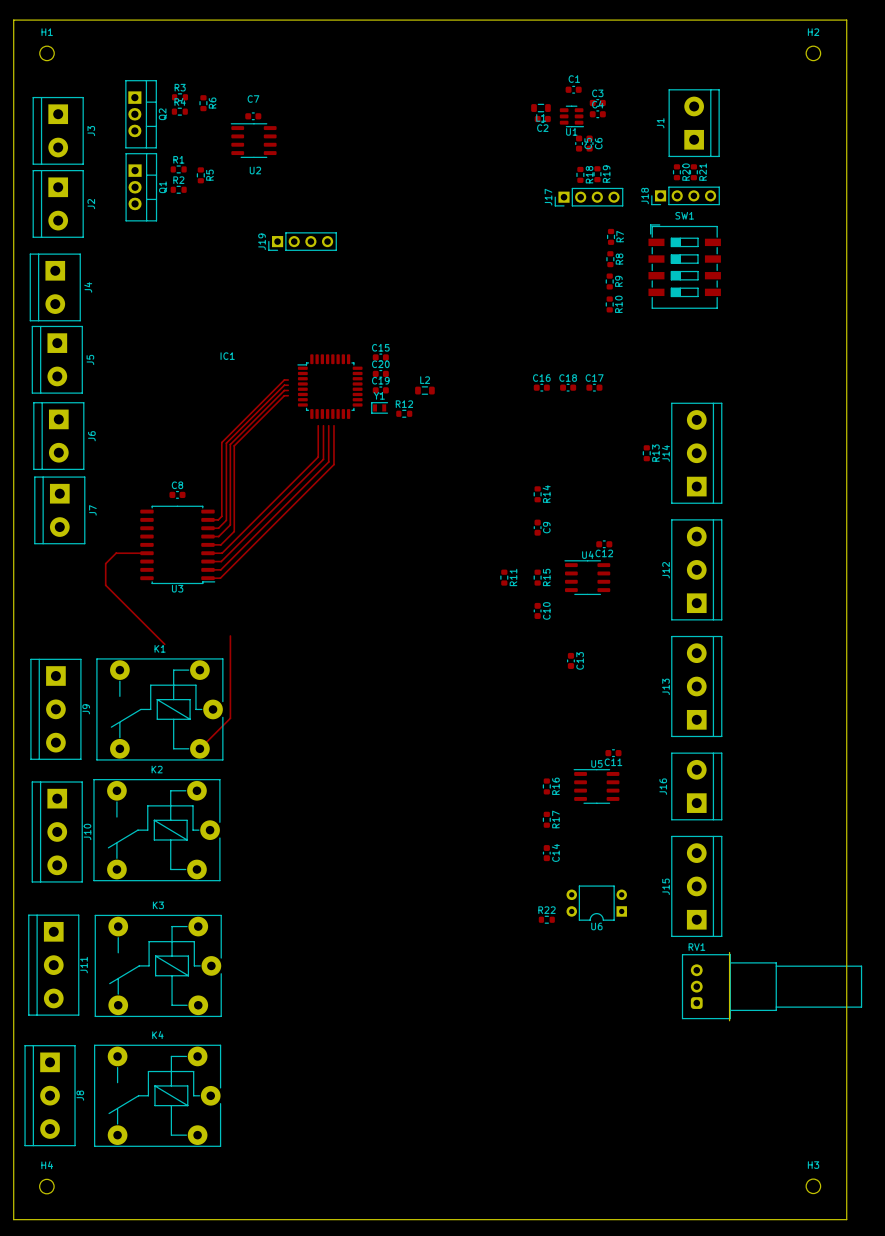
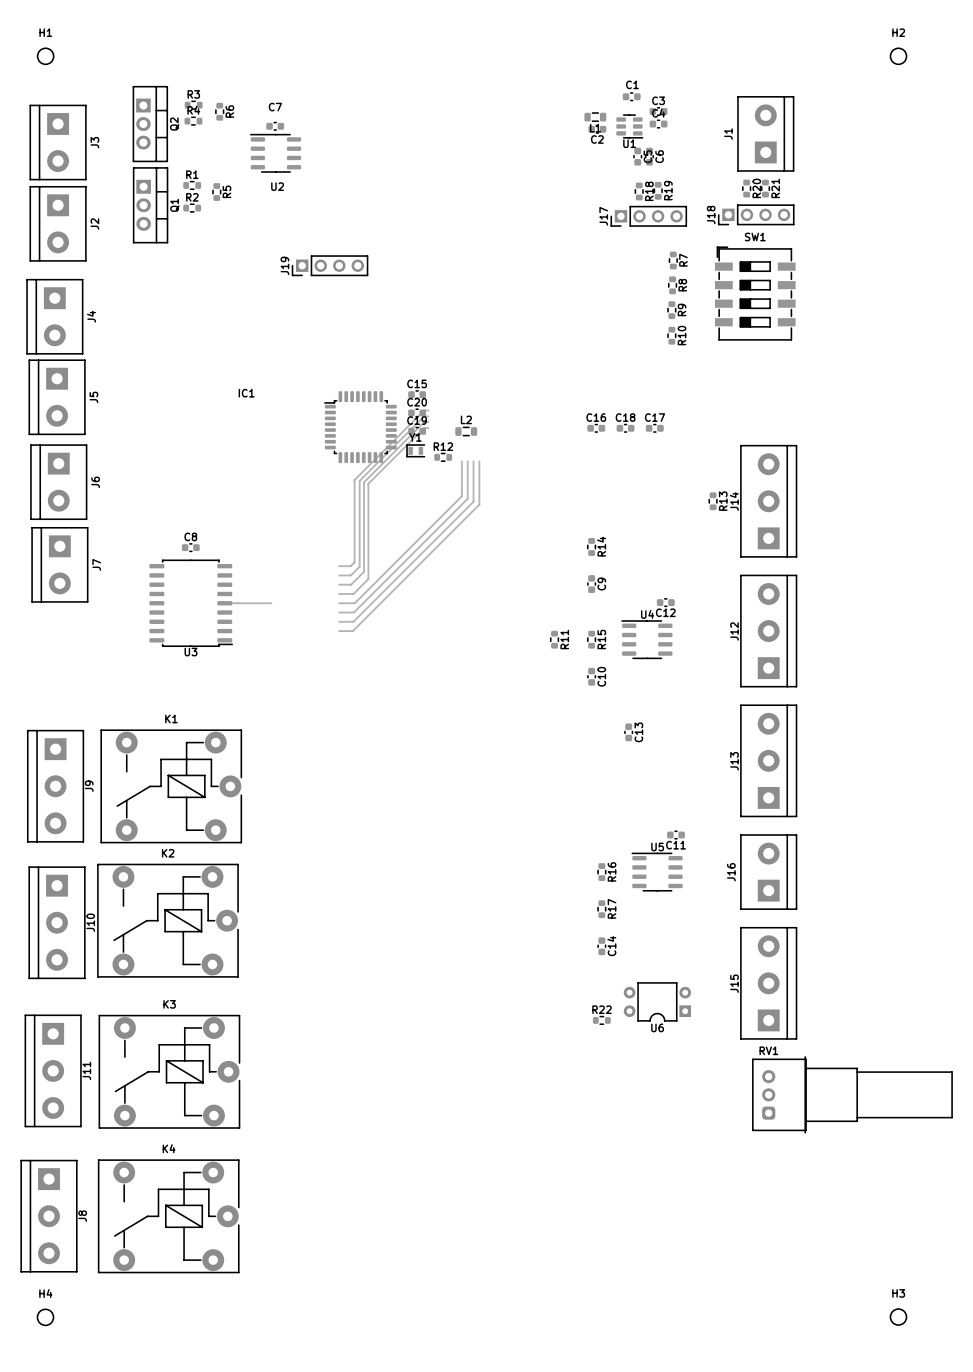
board edge: (13, 20) (846, 20) (846, 1219) (13, 1219) (13, 20) -> none
track: (288, 379) (284, 379) (221, 442) (221, 516) (218, 519) (207, 519) -> (428, 410) (424, 410) (354, 480) (354, 562) (350, 566) (339, 566)
track: (288, 385) (284, 385) (226, 443) (226, 520) (218, 528) (207, 528) -> (428, 416) (424, 416) (359, 480) (359, 566) (350, 575) (339, 575)
track: none -> (428, 427) (424, 427) (368, 483) (368, 579) (353, 593) (339, 593)
track: (288, 390) (284, 390) (230, 444) (230, 524) (218, 536) (207, 536) -> (428, 422) (424, 422) (364, 482) (364, 571) (351, 584) (339, 584)
track: (288, 395) (284, 395) (234, 445) (234, 531) (220, 544) -> (271, 603) (239, 603)
track: (318, 425) (318, 457) (222, 553) (207, 553) -> (461, 461) (461, 496) (354, 603) (339, 603)
track: (323, 425) (323, 459) (221, 561) (207, 561) -> (467, 461) (467, 498) (353, 612) (339, 612)
track: (328, 425) (328, 461) (220, 569) (207, 569) -> (473, 461) (473, 501) (353, 621) (339, 621)
track: (333, 425) (333, 464) (220, 578) (207, 578) -> (479, 461) (479, 504) (352, 631) (339, 631)
track: (146, 553) (116, 553) (105, 563) (105, 585) (164, 644) -> none
track: (230, 635) (230, 718) (199, 748) -> none

